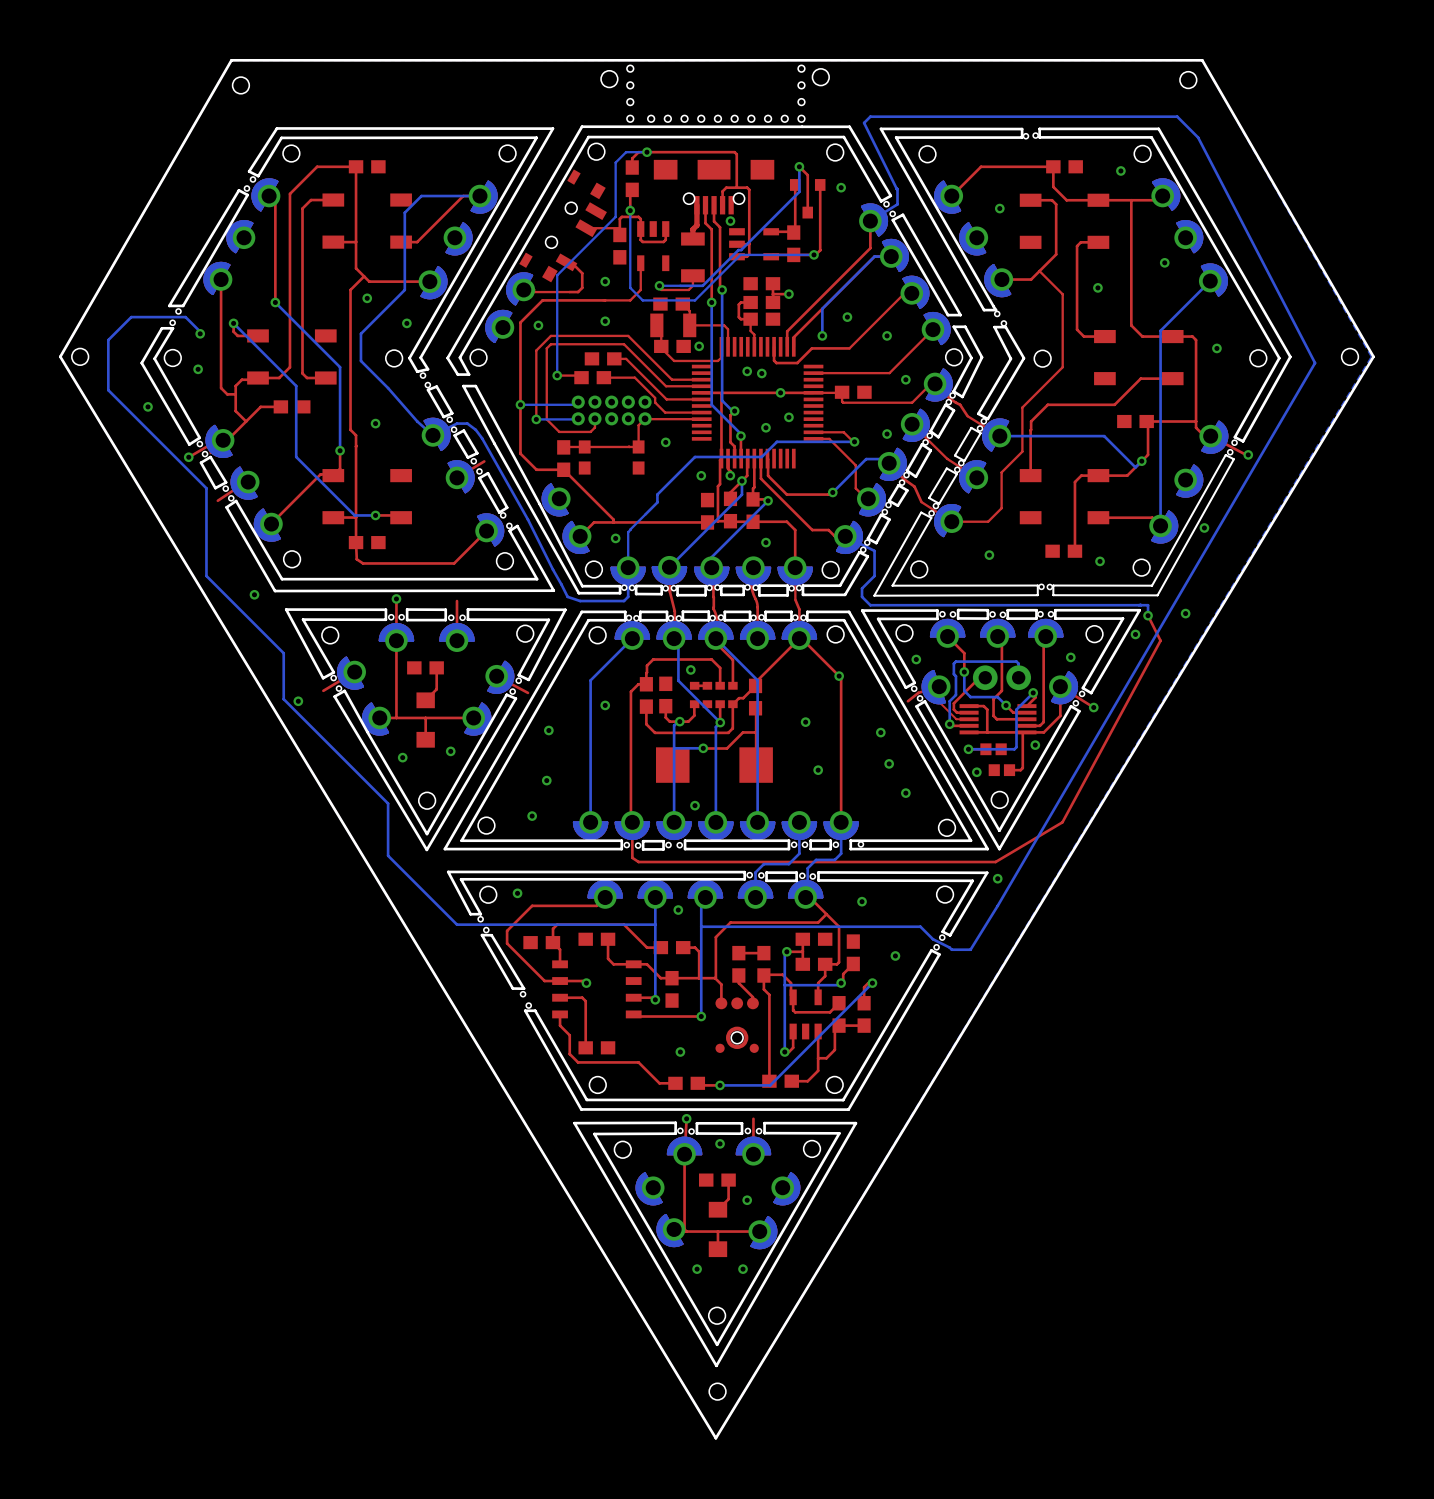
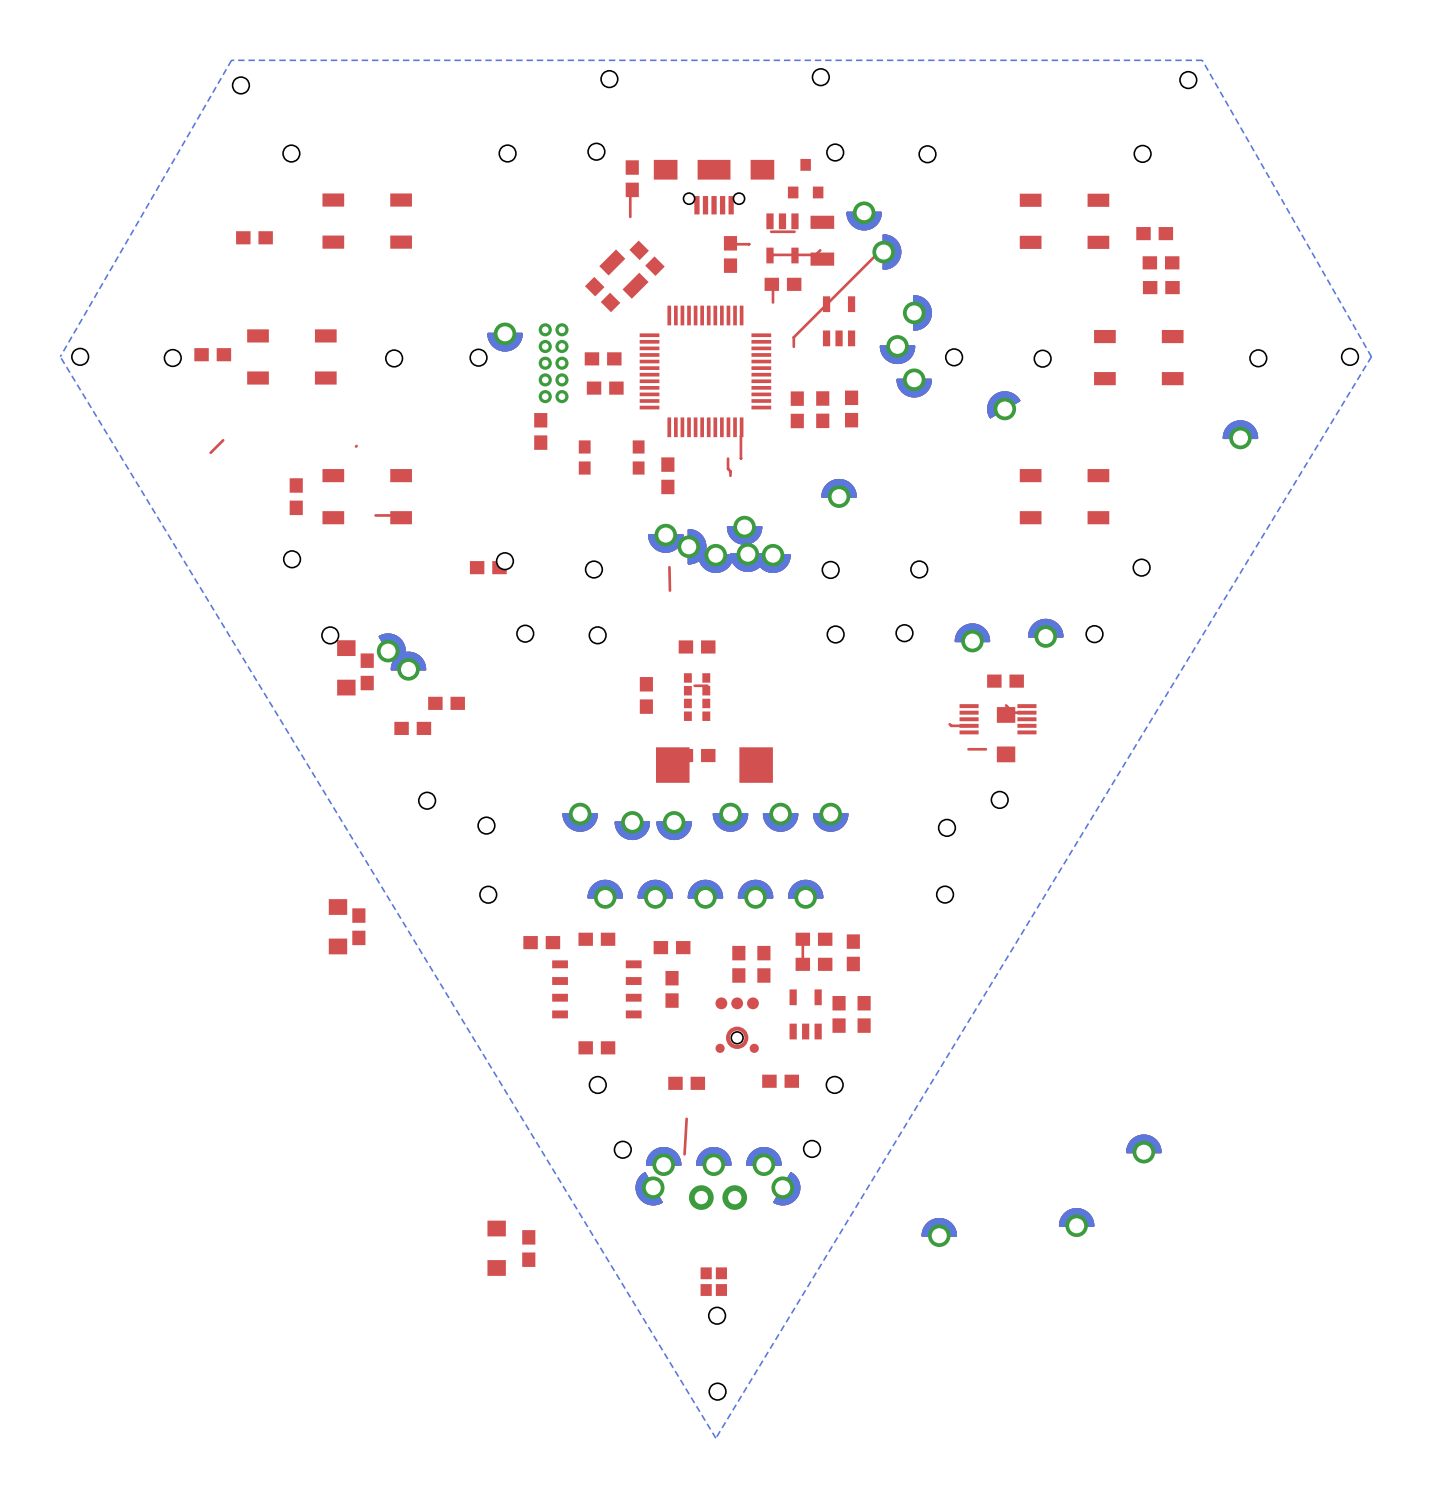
board edge: (1202, 60) (231, 60) (60, 356) (715, 1438) (1373, 356) (1202, 60) -> none
hole: (630, 68) -> none
hole: (801, 68) -> none
hole: (630, 85) -> none
hole: (801, 85) -> none
hole: (630, 102) -> none
hole: (801, 102) -> none
hole: (630, 118) -> none
hole: (651, 118) -> none
hole: (667, 118) -> none
hole: (684, 118) -> none
hole: (701, 118) -> none
hole: (717, 118) -> none
hole: (734, 118) -> none
hole: (751, 118) -> none
hole: (768, 118) -> none
hole: (784, 118) -> none
hole: (801, 118) -> none
board edge: (582, 126) (849, 126) (890, 195) (881, 201) (843, 137) (588, 137) (459, 357) (469, 374) (457, 374) (447, 358) (582, 126) -> none
board edge: (276, 128) (552, 128) (420, 357) (428, 369) (417, 371) (409, 358) (536, 137) (281, 137) (258, 176) (249, 171) (276, 128) -> none
board edge: (880, 128) (1022, 129) (1022, 137) (896, 137) (996, 310) (984, 310) (880, 128) -> none
board edge: (1158, 128) (1290, 356) (1243, 441) (1234, 437) (1279, 358) (1151, 137) (1039, 137) (1039, 128) (1158, 128) -> none
hole: (1035, 135) -> none
hole: (1025, 136) -> none
via: (646, 152) -> none
bottom track: (651, 152) (626, 152) (615, 162) (615, 216) (557, 275) (557, 375) -> none
part: (367, 166) -> none
top track: (799, 166) (807, 175) (807, 212) -> none
bottom track: (799, 166) (799, 191) (702, 285) (659, 285) -> none
via: (799, 166) -> none
part: (1064, 166) -> none
top track: (632, 167) (632, 158) (638, 152) (734, 152) (736, 154) (736, 187) -> none
via: (1120, 170) -> none
hole: (252, 179) -> none
top track: (795, 184) (793, 232) -> none
top track: (820, 184) (820, 250) -> none
via: (841, 187) -> none
hole: (246, 188) -> none
bottom track: (896, 189) (897, 204) (870, 221) -> none
bottom track: (896, 189) (864, 122) (870, 116) (1177, 116) (1198, 137) (1315, 363) (970, 949) (951, 949) (933, 939) (920, 926) (701, 926) -> none
board edge: (238, 190) (169, 305) (183, 305) (247, 195) (238, 190) -> none
top track: (955, 192) (981, 166) (1053, 166) (1053, 186) (1066, 200) (1156, 200) (1159, 196) (1162, 196) -> none
part: (265, 194) -> none
part: (1165, 194) -> none
top track: (269, 196) (275, 202) (275, 302) -> none
top track: (479, 196) (463, 196) (417, 242) (401, 242) -> none
bottom track: (479, 196) (475, 193) (473, 196) (421, 196) (404, 212) (404, 289) (360, 333) (360, 360) (417, 421) (432, 435) (456, 423) (467, 423) (475, 429) (527, 519) (567, 596) (580, 601) (624, 601) (628, 596) (628, 532) (657, 502) (657, 494) (695, 456) (761, 456) (776, 441) (854, 441) (854, 443) -> none
part: (483, 197) -> none
part: (948, 197) -> none
part rotation: 0° (807, 198) -> 180° (805, 178)
top track: (333, 200) (311, 200) (302, 208) (302, 373) (307, 378) (325, 378) -> none
top track: (1030, 200) (1052, 200) (1056, 204) (1056, 254) (1031, 279) (1001, 279) -> none
top track: (1131, 200) (1131, 325) (1142, 336) (1192, 336) (1196, 340) (1196, 427) (1204, 436) (1210, 436) (1248, 454) -> none
hole: (886, 204) -> none
top track: (696, 205) (696, 225) (692, 229) (692, 238) -> none
top track: (705, 205) (705, 223) (711, 229) (711, 302) -> none
top track: (714, 205) (714, 221) (720, 227) (720, 287) (722, 289) -> none
top track: (722, 205) (722, 191) (726, 187) (747, 187) (749, 189) (749, 254) (747, 256) (736, 256) -> none
bottom track: (630, 206) (630, 287) (642, 300) (695, 300) (740, 254) (814, 254) -> none
via: (999, 208) -> none
via: (630, 210) -> none
hole: (892, 213) -> none
board edge: (902, 214) (892, 220) (947, 315) (960, 315) (902, 214) -> none
part rotation: 0° (873, 219) -> 120° clockwise (864, 215)
via: (730, 221) -> none
top track: (870, 221) (866, 223) (870, 230) (870, 248) (787, 331) (787, 346) -> none
part: (563, 225) -> none
part footprint: [787, 225, 801, 263] -> [766, 213, 799, 264]
top track: (619, 228) (586, 228) -> none
top track: (665, 229) (665, 239) (663, 241) (642, 241) (640, 239) -> none
part: none -> (1154, 233)
top track: (619, 234) (619, 218) (621, 216) (638, 216) (640, 219) (640, 239) -> none
part: (240, 236) -> none
part: (1188, 236) -> none
part: none -> (254, 237)
part: (458, 238) -> none
part: (973, 238) -> none
top track: (355, 242) (333, 242) -> none
top track: (1098, 242) (1080, 242) (1077, 246) (1077, 329) (1083, 336) (1104, 336) (1103, 337) -> none
part: (754, 244) -> none
part: (619, 246) -> none
part: (653, 246) -> none
part: none -> (730, 254)
via: (814, 254) -> none
part rotation: 0° (894, 255) -> 30° clockwise (886, 252)
bottom track: (891, 256) (888, 258) (884, 256) (874, 256) (822, 308) (822, 335) -> none
part position: (692, 257) -> (822, 240)
part: none -> (647, 258)
top track: (566, 262) (571, 262) (582, 273) (582, 287) (578, 292) (530, 292) (530, 289) -> none
part: none -> (1161, 262)
via: (1164, 262) -> none
top track: (640, 263) (640, 289) (630, 300) (603, 300) -> none
top track: (1039, 271) (1062, 294) (1062, 367) (1022, 407) (1022, 451) (1001, 472) (1001, 508) (988, 521) (951, 521) (921, 502) (914, 486) (903, 478) (889, 463) -> none
part: none -> (623, 274)
top track: (692, 275) (692, 285) (688, 289) (661, 289) (659, 285) -> none
top track: (364, 276) (350, 289) (350, 429) (356, 435) (356, 559) (363, 563) (454, 563) (486, 531) -> none
part: (217, 278) -> none
top track: (221, 279) (221, 388) (227, 394) (235, 394) -> none
part: (1213, 279) -> none
part: (998, 280) -> none
top track: (429, 281) (427, 279) (423, 281) (369, 281) (356, 268) (356, 166) (317, 166) (289, 193) (289, 367) (279, 378) (241, 379) (235, 386) (235, 411) (246, 421) -> none
via: (605, 281) -> none
bottom track: (1210, 281) (1160, 330) (1160, 516) (1156, 523) (1160, 525) -> none
part: (433, 282) -> none
part: (761, 283) -> none
part: none -> (782, 284)
via: (659, 285) -> none
via: (1097, 287) -> none
part: none -> (1161, 287)
part: (520, 288) -> none
bottom track: (722, 289) (722, 400) (734, 413) (734, 411) -> none
via: (722, 289) -> none
part: (915, 292) -> none
top track: (911, 293) (904, 293) (849, 348) (811, 348) (797, 363) (776, 363) (774, 360) (774, 346) -> none
part: none -> (602, 294)
top track: (788, 294) (772, 294) -> none
via: (788, 294) -> none
via: (367, 298) -> none
top track: (605, 300) (542, 300) (520, 322) (520, 453) (536, 469) (563, 469) -> none
bottom track: (275, 302) (340, 367) (340, 450) -> none
via: (275, 302) -> none
bottom track: (711, 302) (711, 404) (740, 436) -> none
via: (711, 302) -> none
top track: (750, 302) (740, 302) (738, 304) (738, 317) (740, 319) (750, 319) (750, 330) (754, 334) (754, 346) -> none
part: (761, 302) -> none
part: (671, 304) -> none
top track: (682, 304) (689, 311) (689, 325) (724, 325) (728, 329) (728, 346) -> none
hole: (178, 311) -> none
part: none -> (917, 312)
hole: (997, 313) -> none
via: (847, 317) -> none
part: (761, 319) -> none
via: (605, 321) -> none
part: none -> (839, 321)
hole: (172, 322) -> none
top track: (233, 323) (233, 331) (237, 335) (258, 335) -> none
bottom track: (233, 323) (296, 386) (296, 456) (354, 515) (375, 515) -> none
via: (233, 323) -> none
via: (406, 323) -> none
hole: (1003, 323) -> none
via: (538, 325) -> none
top track: (656, 325) (661, 329) (661, 348) (674, 360) (717, 360) (721, 357) (721, 346) -> none
part: (673, 325) -> none
part rotation: 0° (499, 326) -> 120° counterclockwise (505, 337)
board edge: (965, 326) (953, 326) (971, 358) (953, 391) (962, 396) (982, 357) (965, 326) -> none
board edge: (1005, 327) (1023, 358) (987, 418) (978, 413) (1010, 358) (994, 327) (1005, 327) -> none
board edge: (172, 328) (154, 358) (199, 437) (189, 444) (141, 363) (161, 328) (172, 328) -> none
part: (936, 328) -> none
top track: (933, 329) (889, 373) (813, 373) -> none
bottom track: (200, 333) (185, 317) (131, 317) (108, 340) (108, 390) (206, 488) (206, 575) (283, 653) (283, 699) (388, 803) (388, 855) (456, 924) (655, 924) -> none
via: (200, 333) -> none
via: (822, 335) -> none
via: (887, 335) -> none
part: (672, 346) -> none
via: (699, 346) -> none
via: (1216, 348) -> none
part: none -> (897, 349)
part: none -> (212, 354)
top track: (614, 358) (626, 358) (666, 399) (701, 399) -> none
via: (198, 369) -> none
via: (747, 371) -> none
via: (761, 373) -> none
hole: (423, 375) -> none
top track: (557, 375) (579, 375) (581, 377) -> none
via: (557, 375) -> none
part position: (592, 377) -> (605, 388)
top track: (603, 377) (634, 377) (655, 397) (655, 402) (665, 412) (701, 412) -> none
top track: (1172, 378) (1140, 378) (1114, 404) (1047, 404) (1031, 421) (1030, 475) -> none
top track: (701, 379) (671, 379) (628, 335) (550, 335) (536, 350) (536, 419) -> none
via: (905, 379) -> none
part: none -> (914, 382)
hole: (427, 385) -> none
part: (938, 385) -> none
board edge: (436, 386) (428, 389) (443, 416) (452, 413) (436, 386) -> none
board edge: (475, 386) (582, 586) (620, 586) (620, 593) (578, 593) (463, 386) (475, 386) -> none
top track: (701, 386) (666, 386) (624, 344) (550, 344) (546, 348) (546, 419) (559, 431) (590, 431) (594, 427) (594, 418) -> none
top track: (928, 386) (912, 402) (843, 402) (842, 392) (701, 392) -> none
top track: (928, 386) (935, 383) (949, 398) (960, 404) (967, 416) (999, 436) -> none
top track: (722, 392) (717, 521) -> none
via: (780, 392) -> none
part rotation: 0° (853, 392) -> 90° clockwise (851, 408)
hole: (952, 395) -> none
bottom track: (578, 402) (575, 404) (520, 404) -> none
part position: (757, 402) -> (705, 371)
hole: (948, 402) -> none
via: (520, 404) -> none
board edge: (945, 404) (930, 431) (938, 437) (953, 410) (945, 404) -> none
part: none -> (1003, 405)
via: (148, 406) -> none
top track: (280, 406) (260, 406) (227, 440) (217, 440) (188, 457) -> none
part: (292, 406) -> none
part: none -> (797, 409)
part: none -> (822, 409)
part rotation: 0° (611, 410) -> 90° clockwise (553, 363)
part position: (611, 410) -> (553, 363)
top track: (734, 411) (730, 415) (730, 442) (734, 446) (734, 458) -> none
via: (734, 411) -> none
via: (788, 417) -> none
bottom track: (578, 418) (536, 419) -> none
hole: (449, 419) -> none
via: (536, 419) -> none
top track: (701, 419) (645, 418) (638, 425) (638, 446) (563, 447) -> none
hole: (983, 421) -> none
part: (1135, 421) -> none
top track: (1148, 421) (1148, 454) (1127, 475) (1081, 475) (1074, 482) (1074, 551) -> none
top track: (1196, 421) (1146, 421) -> none
via: (375, 423) -> none
top track: (912, 424) (947, 458) (976, 477) -> none
part: (915, 425) -> none
via: (765, 427) -> none
board edge: (971, 427) (954, 455) (964, 460) (980, 433) (971, 427) -> none
hole: (980, 428) -> none
hole: (454, 429) -> none
board edge: (463, 430) (477, 453) (467, 457) (454, 435) (463, 430) -> none
top track: (813, 432) (843, 432) (854, 441) -> none
part: (436, 434) -> none
via: (887, 434) -> none
part: (996, 434) -> none
part: none -> (1240, 434)
hole: (929, 435) -> none
via: (740, 436) -> none
bottom track: (999, 436) (1104, 436) (1135, 467) (1141, 461) -> none
part: (1213, 437) -> none
top track: (813, 438) (829, 438) (855, 465) (855, 488) (868, 498) -> none
part: (219, 441) -> none
via: (854, 441) -> none
via: (665, 442) -> none
hole: (925, 442) -> none
hole: (1234, 442) -> none
hole: (199, 444) -> none
board edge: (922, 444) (907, 470) (915, 476) (930, 450) (922, 444) -> none
top track: (340, 450) (340, 468) (333, 475) -> none
via: (340, 450) -> none
hole: (1230, 452) -> none
hole: (205, 454) -> none
via: (1248, 454) -> none
board edge: (1225, 455) (1152, 585) (1053, 585) (1053, 595) (1157, 595) (1233, 459) (1225, 455) -> none
via: (188, 457) -> none
board edge: (210, 457) (226, 482) (215, 488) (201, 462) (210, 457) -> none
part position: (563, 458) -> (540, 431)
top track: (747, 458) (747, 475) (730, 492) (730, 498) (732, 496) -> none
top track: (754, 458) (753, 499) (768, 500) -> none
top track: (760, 458) (760, 478) (812, 530) (828, 530) (834, 536) (845, 536) -> none
top track: (767, 458) (768, 475) (786, 494) (828, 494) (832, 492) -> none
hole: (473, 461) -> none
top track: (484, 461) (456, 477) -> none
via: (1141, 461) -> none
bottom track: (889, 463) (884, 459) (866, 459) (832, 492) -> none
hole: (961, 463) -> none
part: (892, 464) -> none
board edge: (946, 468) (929, 497) (939, 503) (956, 474) (946, 468) -> none
top track: (563, 469) (613, 519) (613, 522) -> none
hole: (957, 469) -> none
hole: (479, 471) -> none
board edge: (487, 473) (507, 507) (499, 512) (479, 478) (487, 473) -> none
top track: (334, 474) (320, 474) (271, 524) -> none
part: none -> (667, 475)
via: (701, 475) -> none
via: (730, 475) -> none
hole: (906, 475) -> none
part: (460, 476) -> none
part: (973, 476) -> none
bottom track: (741, 481) (741, 494) (669, 567) -> none
via: (741, 481) -> none
part: (1188, 481) -> none
top track: (248, 482) (217, 500) -> none
hole: (902, 482) -> none
part: (245, 483) -> none
board edge: (898, 485) (889, 500) (897, 505) (907, 490) (898, 485) -> none
hole: (225, 488) -> none
via: (832, 492) -> none
part: none -> (839, 493)
part: none -> (296, 496)
hole: (231, 498) -> none
part: (556, 499) -> none
part: (871, 499) -> none
bottom track: (768, 500) (711, 557) (711, 567) -> none
via: (768, 500) -> none
board edge: (236, 501) (282, 579) (537, 579) (509, 530) (517, 526) (553, 590) (275, 591) (226, 507) (236, 501) -> none
hole: (888, 505) -> none
hole: (935, 506) -> none
part: (730, 510) -> none
part: (753, 510) -> none
part: (707, 511) -> none
hole: (884, 512) -> none
board edge: (921, 512) (931, 517) (892, 585) (1037, 585) (1037, 595) (874, 595) (921, 512) -> none
hole: (931, 513) -> none
board edge: (881, 514) (867, 538) (876, 543) (889, 519) (881, 514) -> none
via: (375, 515) -> none
hole: (503, 515) -> none
top track: (356, 517) (333, 517) -> none
top track: (1098, 517) (1152, 517) (1160, 525) -> none
part: (948, 520) -> none
part: (268, 525) -> none
hole: (509, 525) -> none
part: (1163, 527) -> none
via: (1204, 527) -> none
part: (489, 529) -> none
part: none -> (744, 530)
top track: (580, 536) (594, 522) (786, 521) (795, 530) (795, 599) (799, 609) (799, 638) -> none
bottom track: (845, 536) (874, 550) (874, 575) (862, 588) (862, 596) (870, 605) (1140, 604) (1148, 605) (1148, 615) -> none
part: (576, 537) -> none
part: (848, 537) -> none
via: (615, 538) -> none
part: none -> (665, 538)
part: (367, 542) -> none
via: (765, 542) -> none
hole: (867, 542) -> none
part: none -> (691, 546)
hole: (863, 549) -> none
part: (1063, 551) -> none
board edge: (859, 552) (840, 585) (802, 585) (802, 594) (845, 594) (867, 556) (859, 552) -> none
via: (989, 555) -> none
part: none -> (747, 557)
part: none -> (773, 558)
via: (1100, 561) -> none
part: none -> (488, 567)
top track: (711, 567) (713, 608) (717, 623) (714, 637) -> none
top track: (753, 567) (751, 583) (757, 605) (757, 638) (752, 633) -> none
part: (628, 570) -> none
part: (669, 570) -> none
part position: (711, 570) -> (715, 558)
part: (753, 570) -> none
part: (795, 570) -> none
board edge: (787, 585) (759, 585) (759, 595) (787, 595) (787, 585) -> none
board edge: (636, 586) (661, 586) (661, 594) (636, 594) (636, 586) -> none
board edge: (705, 586) (677, 586) (677, 595) (705, 595) (705, 586) -> none
board edge: (743, 586) (721, 586) (721, 594) (743, 594) (743, 586) -> none
hole: (1041, 586) -> none
hole: (624, 587) -> none
hole: (632, 587) -> none
hole: (709, 587) -> none
hole: (717, 587) -> none
hole: (747, 587) -> none
hole: (755, 587) -> none
hole: (1049, 587) -> none
hole: (665, 588) -> none
top track: (669, 588) (674, 611) (674, 637) (667, 631) -> none
hole: (673, 588) -> none
hole: (791, 588) -> none
hole: (799, 588) -> none
via: (254, 594) -> none
top track: (396, 598) (396, 717) -> none
via: (396, 598) -> none
top track: (456, 601) (456, 640) -> none
board edge: (286, 609) (323, 678) (333, 672) (303, 619) (385, 619) (385, 609) (286, 609) -> none
board edge: (407, 609) (407, 620) (445, 620) (445, 609) (407, 609) -> none
board edge: (467, 609) (467, 619) (548, 619) (518, 675) (528, 679) (565, 609) (467, 609) -> none
board edge: (937, 610) (937, 618) (878, 618) (914, 682) (905, 687) (862, 610) (937, 610) -> none
board edge: (958, 610) (987, 610) (987, 618) (958, 618) (958, 610) -> none
board edge: (1036, 610) (1007, 610) (1007, 618) (1036, 618) (1036, 610) -> none
board edge: (1139, 610) (1091, 693) (1082, 688) (1122, 618) (1055, 618) (1055, 610) (1139, 610) -> none
board edge: (625, 611) (581, 611) (444, 849) (621, 849) (621, 840) (461, 840) (588, 620) (625, 620) (625, 611) -> none
board edge: (667, 611) (640, 611) (640, 620) (667, 620) (667, 611) -> none
board edge: (708, 611) (708, 620) (682, 620) (682, 611) (708, 611) -> none
board edge: (750, 611) (724, 611) (724, 620) (750, 620) (750, 611) -> none
board edge: (791, 611) (765, 611) (765, 620) (791, 620) (791, 611) -> none
board edge: (849, 611) (807, 611) (807, 620) (844, 620) (971, 840) (850, 840) (850, 849) (987, 849) (849, 611) -> none
via: (1185, 613) -> none
hole: (942, 614) -> none
hole: (952, 614) -> none
hole: (992, 614) -> none
hole: (1002, 614) -> none
hole: (1040, 614) -> none
hole: (1051, 614) -> none
top track: (1148, 615) (1160, 640) (1062, 822) (995, 862) (638, 862) (632, 857) (630, 691) (638, 684) (646, 684) (646, 665) (653, 659) (711, 659) (720, 667) (720, 685) -> none
via: (1148, 615) -> none
hole: (391, 617) -> none
hole: (401, 617) -> none
hole: (451, 617) -> none
hole: (462, 617) -> none
hole: (628, 617) -> none
hole: (720, 617) -> none
hole: (753, 617) -> none
hole: (761, 617) -> none
hole: (795, 617) -> none
hole: (803, 617) -> none
hole: (636, 618) -> none
hole: (670, 618) -> none
hole: (678, 618) -> none
hole: (712, 618) -> none
top track: (709, 632) (719, 641) (719, 646) (732, 659) (732, 685) -> none
part: (947, 633) -> none
part: (997, 633) -> none
via: (1135, 634) -> none
part: (632, 635) -> none
part: (674, 635) -> none
part: (715, 635) -> none
part: (757, 635) -> none
part: (799, 635) -> none
top track: (947, 636) (964, 653) (964, 672) -> none
top track: (997, 636) (1001, 640) (1001, 690) (993, 699) (993, 715) (996, 719) (1026, 719) -> none
top track: (1045, 636) (1043, 638) (1043, 722) (1039, 725) (1026, 725) -> none
part: (396, 637) -> none
part: (456, 637) -> none
part: none -> (972, 637)
bottom track: (632, 638) (590, 680) (590, 822) -> none
bottom track: (674, 638) (678, 642) (678, 680) (720, 722) (715, 726) (715, 822) -> none
bottom track: (715, 638) (757, 680) (757, 822) -> none
top track: (799, 638) (799, 636) (841, 678) (841, 822) -> none
top track: (799, 638) (755, 682) (755, 685) (743, 698) (739, 698) (732, 704) (732, 728) (728, 732) (654, 732) (646, 724) (646, 706) -> none
part: none -> (697, 646)
part footprint: [336, 656, 366, 690] -> [337, 640, 356, 696]
via: (1070, 657) -> none
via: (916, 659) -> none
part footprint: [972, 665, 1032, 691] -> [987, 674, 1024, 688]
part: none -> (408, 666)
part: (425, 667) -> none
top track: (436, 667) (436, 689) (425, 700) -> none
via: (690, 669) -> none
part: none -> (367, 671)
top track: (354, 672) (323, 690) -> none
bottom track: (964, 672) (964, 690) (970, 697) (997, 697) (1006, 705) -> none
via: (964, 672) -> none
top track: (496, 676) (527, 692) -> none
via: (839, 676) -> none
part: (499, 677) -> none
top track: (985, 677) (979, 677) (953, 703) (953, 709) (956, 712) (969, 712) -> none
bottom track: (1018, 677) (1018, 663) (1016, 661) (955, 661) (953, 663) (955, 695) (949, 701) (949, 724) -> none
hole: (333, 678) -> none
hole: (518, 680) -> none
part: (936, 687) -> none
part: (1063, 687) -> none
hole: (338, 688) -> none
hole: (914, 688) -> none
board edge: (344, 690) (427, 834) (506, 694) (515, 698) (426, 849) (334, 696) (344, 690) -> none
hole: (512, 691) -> none
top track: (1033, 692) (1035, 697) (1026, 706) -> none
bottom track: (1033, 692) (1016, 709) (1016, 747) (1014, 749) (968, 749) -> none
via: (1033, 692) -> none
hole: (1082, 693) -> none
part: (665, 694) -> none
part rotation: 0° (713, 694) -> 90° clockwise (697, 697)
part: (755, 697) -> none
hole: (920, 698) -> none
via: (298, 701) -> none
top track: (907, 701) (918, 692) (939, 686) (939, 702) (956, 719) (969, 719) -> none
board edge: (924, 701) (999, 830) (1071, 706) (1079, 711) (999, 849) (916, 706) (924, 701) -> none
part: none -> (446, 703)
hole: (1075, 703) -> none
top track: (694, 704) (694, 715) (688, 721) (669, 721) (665, 717) (665, 706) -> none
top track: (720, 704) (720, 722) -> none
via: (605, 705) -> none
via: (1006, 705) -> none
top track: (969, 706) (983, 706) (987, 709) (987, 732) -> none
top track: (1093, 707) (1060, 686) (1060, 715) (1043, 732) (969, 732) -> none
via: (1093, 707) -> none
top track: (755, 708) (756, 765) -> none
top track: (425, 717) (425, 739) -> none
top track: (473, 717) (379, 717) -> none
part rotation: 0° (376, 719) -> 180° (391, 650)
part position: (376, 719) -> (391, 650)
part: (476, 719) -> none
part position: (425, 720) -> (337, 926)
bottom track: (679, 721) (674, 725) (674, 822) -> none
via: (679, 721) -> none
via: (720, 722) -> none
via: (805, 722) -> none
via: (949, 724) -> none
part: none -> (412, 728)
via: (548, 730) -> none
top track: (756, 732) (742, 732) (726, 748) (703, 748) -> none
via: (880, 732) -> none
top track: (1022, 732) (1022, 768) (1020, 770) (1009, 770) -> none
part: none -> (1006, 734)
via: (1035, 745) -> none
bottom track: (703, 748) (674, 749) -> none
via: (703, 748) -> none
via: (968, 749) -> none
part: (993, 749) -> none
via: (450, 751) -> none
part: none -> (697, 755)
via: (402, 757) -> none
via: (889, 763) -> none
via: (818, 770) -> none
part: (1001, 770) -> none
via: (976, 772) -> none
via: (546, 780) -> none
via: (905, 793) -> none
via: (695, 805) -> none
via: (532, 816) -> none
part: none -> (730, 817)
part: none -> (780, 817)
bottom track: (799, 822) (799, 853) (788, 864) (763, 864) (755, 872) (755, 897) -> none
bottom track: (841, 822) (841, 853) (834, 859) (816, 859) (807, 868) (807, 895) (805, 897) -> none
part position: (590, 825) -> (580, 817)
part: (715, 825) -> none
part: (757, 825) -> none
part: (799, 825) -> none
part position: (841, 825) -> (830, 817)
board edge: (788, 840) (685, 840) (685, 849) (788, 849) (788, 840) -> none
board edge: (830, 840) (810, 840) (810, 849) (830, 849) (830, 840) -> none
board edge: (663, 841) (643, 841) (643, 849) (663, 849) (663, 841) -> none
hole: (794, 844) -> none
hole: (804, 844) -> none
hole: (835, 844) -> none
hole: (860, 844) -> none
hole: (626, 845) -> none
hole: (638, 845) -> none
hole: (668, 845) -> none
hole: (679, 845) -> none
board edge: (448, 871) (470, 914) (480, 914) (461, 879) (744, 879) (744, 872) (448, 871) -> none
board edge: (796, 872) (796, 880) (766, 880) (766, 872) (796, 872) -> none
board edge: (818, 872) (818, 880) (972, 880) (942, 931) (950, 935) (987, 872) (818, 872) -> none
hole: (749, 875) -> none
hole: (761, 875) -> none
hole: (802, 875) -> none
hole: (812, 876) -> none
via: (997, 878) -> none
via: (517, 893) -> none
top track: (605, 897) (596, 905) (532, 905) (507, 930) (507, 943) (544, 981) (582, 981) (586, 983) -> none
bottom track: (655, 897) (655, 999) -> none
bottom track: (705, 897) (701, 901) (701, 1016) -> none
top track: (805, 897) (809, 897) (839, 926) (839, 962) (836, 964) (825, 964) (825, 976) (818, 983) (818, 997) -> none
via: (862, 901) -> none
via: (678, 910) -> none
top track: (826, 914) (818, 922) (730, 922) (715, 937) (715, 978) -> none
hole: (480, 919) -> none
part: none -> (358, 926)
hole: (486, 930) -> none
board edge: (481, 935) (491, 935) (524, 988) (512, 988) (481, 935) -> none
hole: (942, 937) -> none
top track: (608, 939) (608, 958) (613, 964) (646, 964) (660, 978) (715, 978) -> none
top track: (552, 942) (560, 949) (560, 964) -> none
top track: (553, 942) (553, 928) (557, 924) (624, 924) (646, 947) (660, 947) -> none
top track: (683, 947) (695, 947) (699, 951) (699, 978) -> none
hole: (936, 947) -> none
board edge: (931, 950) (843, 1100) (586, 1099) (535, 1010) (525, 1010) (581, 1109) (848, 1109) (939, 954) (931, 950) -> none
bottom track: (786, 951) (784, 953) (784, 1052) -> none
via: (786, 951) -> none
top track: (802, 951) (786, 951) -> none
top track: (763, 953) (738, 953) -> none
via: (895, 955) -> none
top track: (853, 963) (843, 974) (843, 983) (841, 983) -> none
top track: (738, 975) (738, 983) (752, 997) (752, 1003) -> none
top track: (715, 978) (721, 984) (721, 1003) -> none
via: (586, 983) -> none
bottom track: (841, 983) (839, 985) (784, 985) -> none
via: (841, 983) -> none
top track: (872, 983) (868, 983) (864, 987) (864, 1003) -> none
bottom track: (872, 983) (770, 1085) (720, 1085) -> none
via: (872, 983) -> none
hole: (523, 994) -> none
top track: (560, 997) (582, 997) (585, 1001) (585, 1047) -> none
top track: (633, 997) (653, 997) (655, 999) -> none
via: (655, 999) -> none
top track: (839, 1003) (829, 1012) (795, 1012) (793, 1010) (791, 983) (782, 974) (763, 975) (763, 989) (769, 994) (769, 1081) -> none
hole: (528, 1005) -> none
top track: (560, 1014) (560, 1025) (569, 1035) (569, 1054) (578, 1062) (638, 1062) (659, 1083) (675, 1083) -> none
top track: (633, 1014) (635, 1016) (701, 1016) -> none
via: (701, 1016) -> none
top track: (864, 1025) (839, 1025) (834, 1029) (834, 1049) (826, 1058) (818, 1058) -> none
top track: (793, 1031) (793, 1047) (788, 1052) (784, 1052) -> none
top track: (818, 1031) (818, 1070) (807, 1081) (791, 1081) -> none
via: (680, 1052) -> none
via: (784, 1052) -> none
top track: (697, 1083) (699, 1085) (720, 1085) -> none
via: (720, 1085) -> none
via: (686, 1118) -> none
top track: (753, 1118) (753, 1154) -> none
board edge: (675, 1122) (675, 1133) (594, 1134) (717, 1344) (839, 1133) (764, 1133) (764, 1123) (855, 1123) (716, 1365) (574, 1123) (675, 1122) -> none
board edge: (742, 1123) (696, 1123) (696, 1133) (742, 1133) (742, 1123) -> none
hole: (680, 1130) -> none
hole: (691, 1131) -> none
hole: (747, 1131) -> none
hole: (759, 1131) -> none
via: (720, 1143) -> none
part: none -> (1143, 1149)
top track: (688, 1150) (684, 1154) (684, 1229) (686, 1231) -> none
part: (684, 1151) -> none
part position: (753, 1151) -> (763, 1161)
part: none -> (663, 1161)
part: none -> (713, 1161)
part rotation: 0° (717, 1180) -> 90° clockwise (528, 1248)
part position: (717, 1180) -> (528, 1248)
top track: (728, 1180) (728, 1199) (717, 1209) -> none
part: none -> (718, 1197)
via: (747, 1200) -> none
part: none -> (1076, 1222)
top track: (674, 1229) (676, 1231) (759, 1231) -> none
part position: (717, 1229) -> (496, 1248)
part: (670, 1230) -> none
top track: (717, 1231) (717, 1249) -> none
part: (762, 1232) -> none
part: none -> (939, 1232)
via: (697, 1269) -> none
via: (743, 1269) -> none
part: none -> (713, 1273)
part: none -> (713, 1290)

